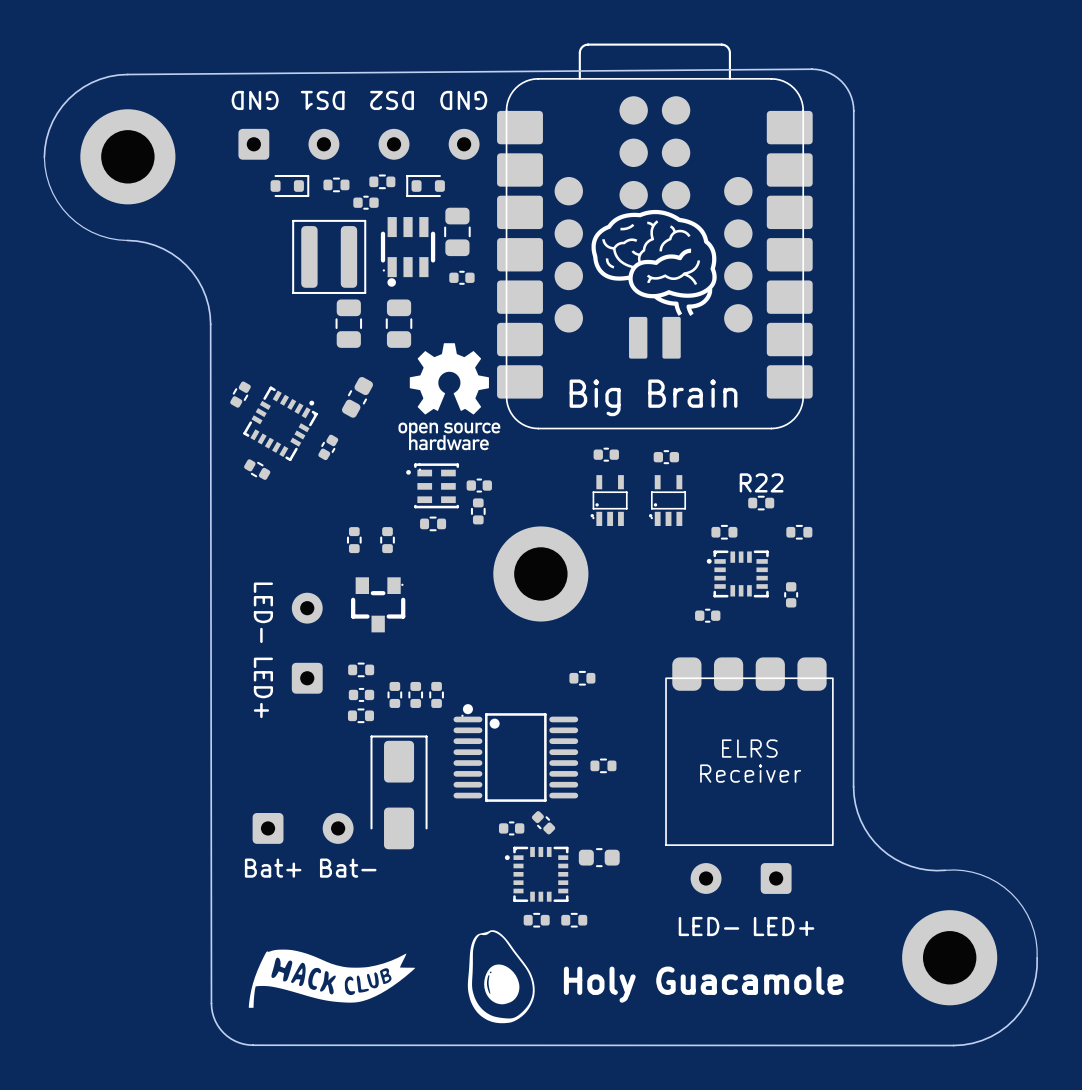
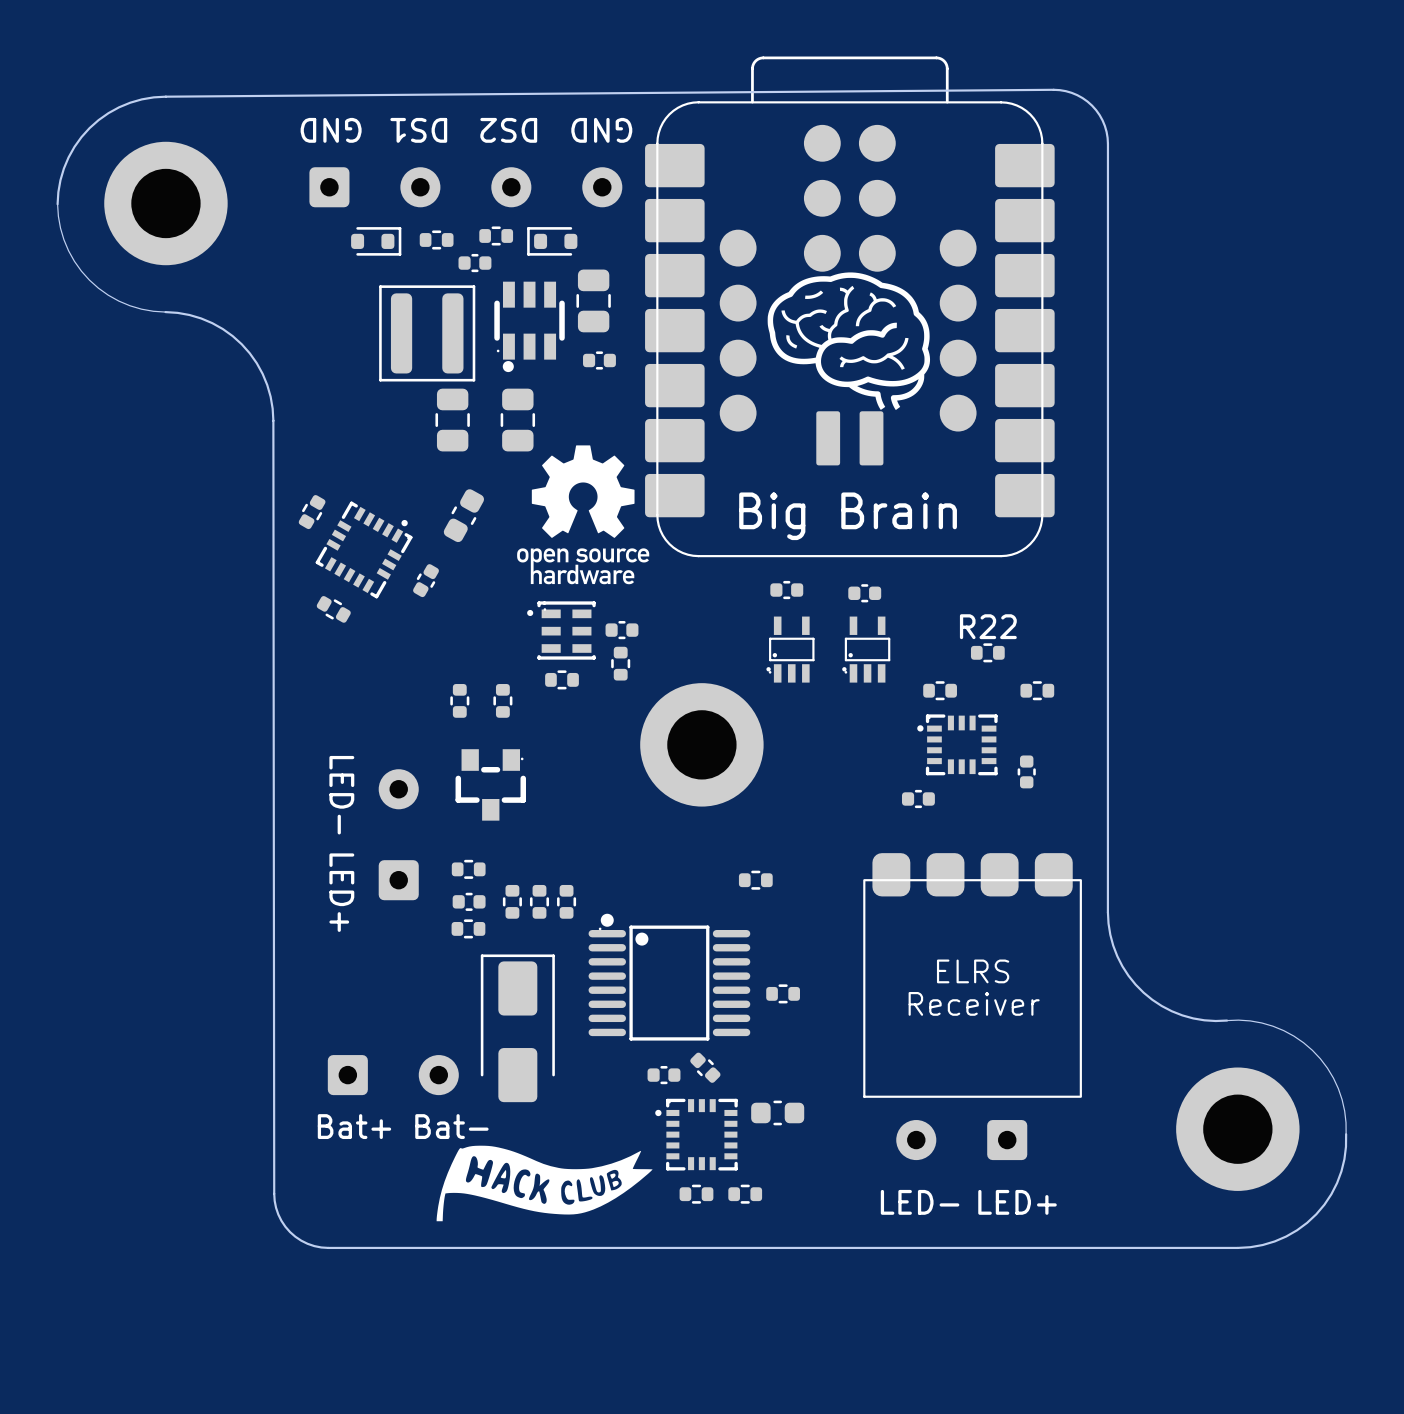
board edge: (853, 110) (853, 786) (855, 804) (860, 820) (869, 835) (881, 848) (895, 859) (919, 868) (963, 870) (980, 874) (996, 882) (1017, 899) (1031, 922) (1037, 948) (1037, 967) (1033, 986) (1020, 1012) (1007, 1026) (990, 1036) (972, 1043) (953, 1045) (248, 1044) (239, 1042) (227, 1036) (217, 1025) (213, 1017) (211, 1003) (211, 919) -> (1107, 143) (1107, 912) (1110, 934) (1117, 956) (1128, 975) (1143, 992) (1161, 1006) (1193, 1018) (1215, 1021) (1250, 1020) (1272, 1026) (1293, 1036) (1320, 1058) (1338, 1088) (1346, 1122) (1345, 1146) (1341, 1171) (1324, 1204) (1307, 1222) (1286, 1236) (1262, 1245) (1237, 1247) (328, 1247) (307, 1243) (290, 1232) (278, 1214) (274, 1193)
drawing: [467, 930, 535, 1024] -> none
part position: (949, 957) -> (1237, 1129)
drawing position: (332, 978) -> (544, 1183)
text: Holy Guacamole (703, 984) -> none

